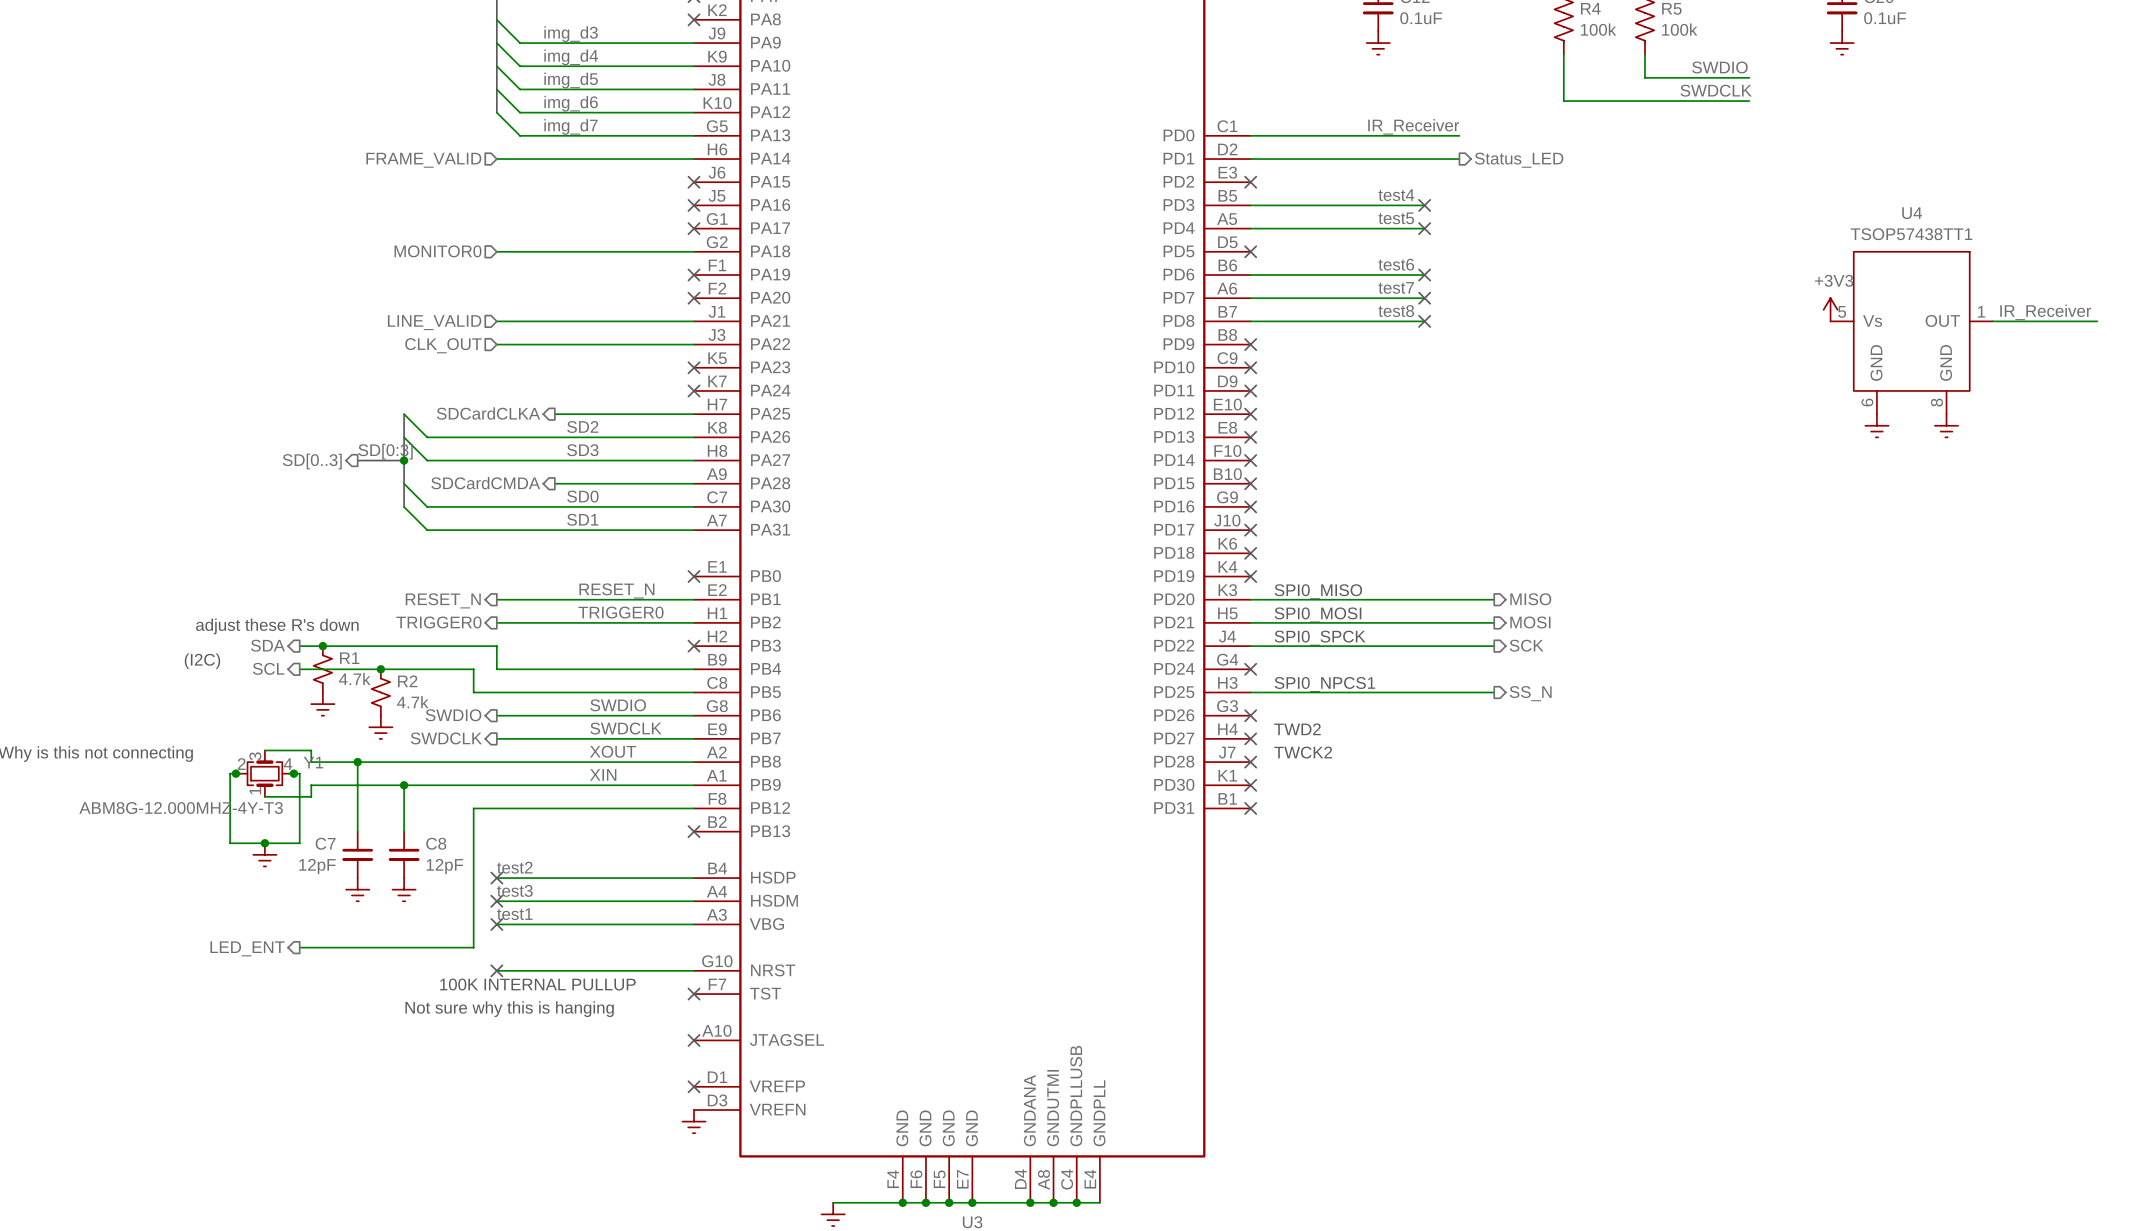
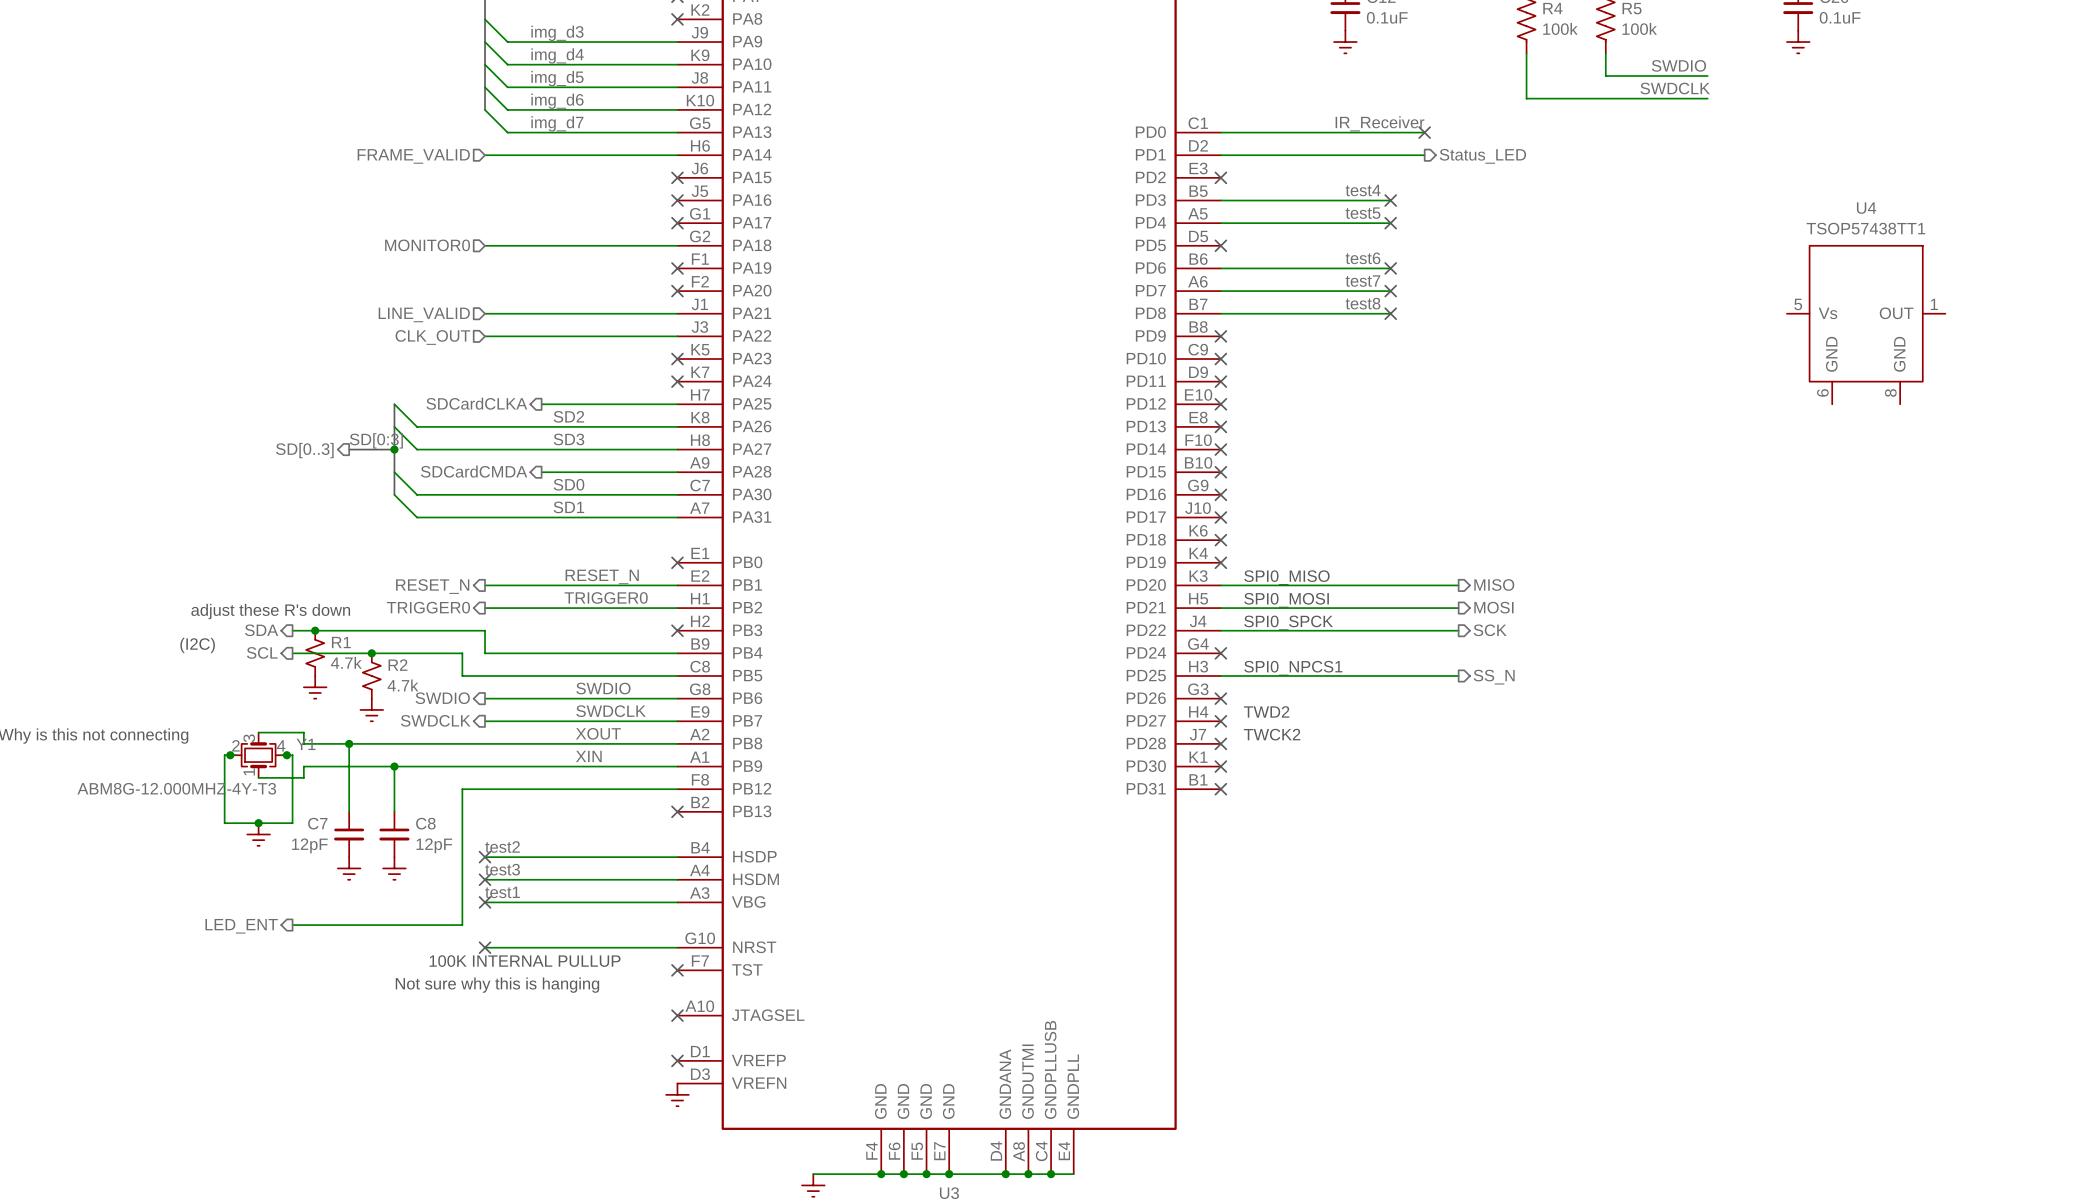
no-connect mark: none -> (1424, 132)
power symbol: +3V3 (1830, 309) -> none
label: IR_Receiver (2045, 312) -> none
wire: (1992, 321) (2097, 321) -> none
power symbol: (1876, 425) -> none
power symbol: (1946, 425) -> none

